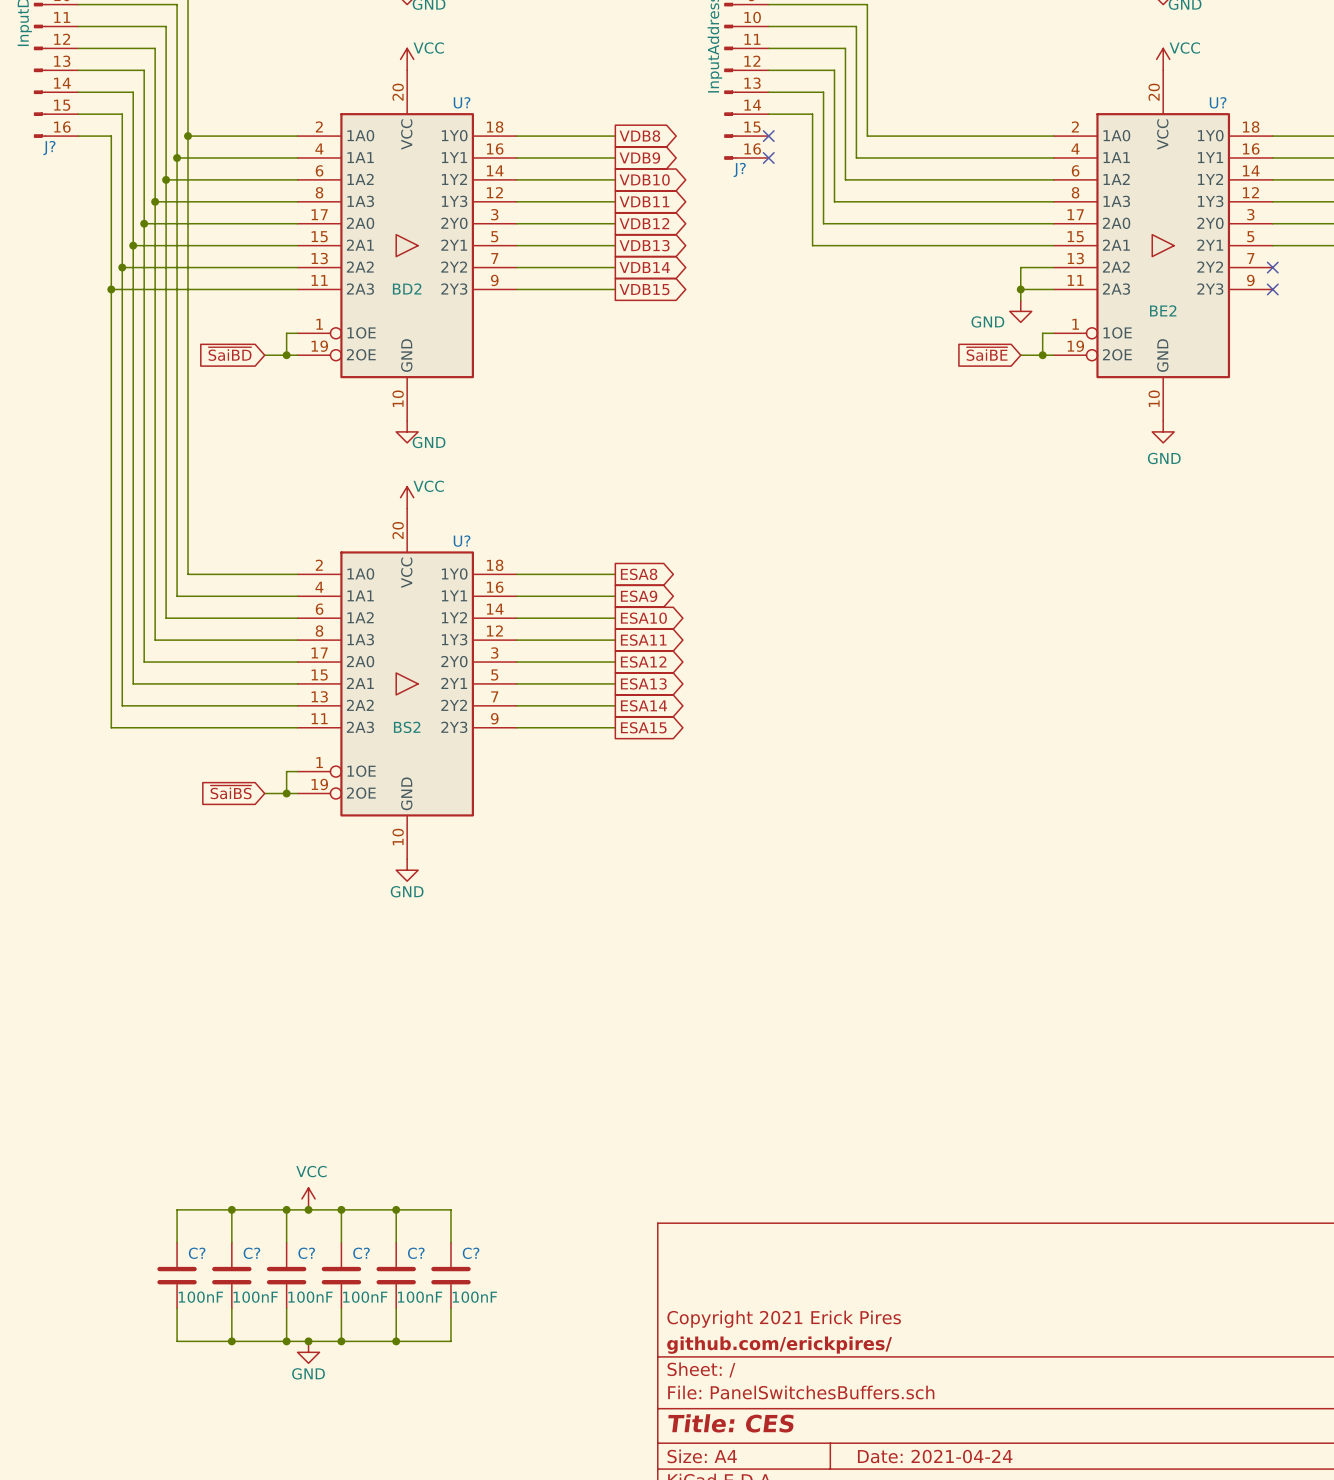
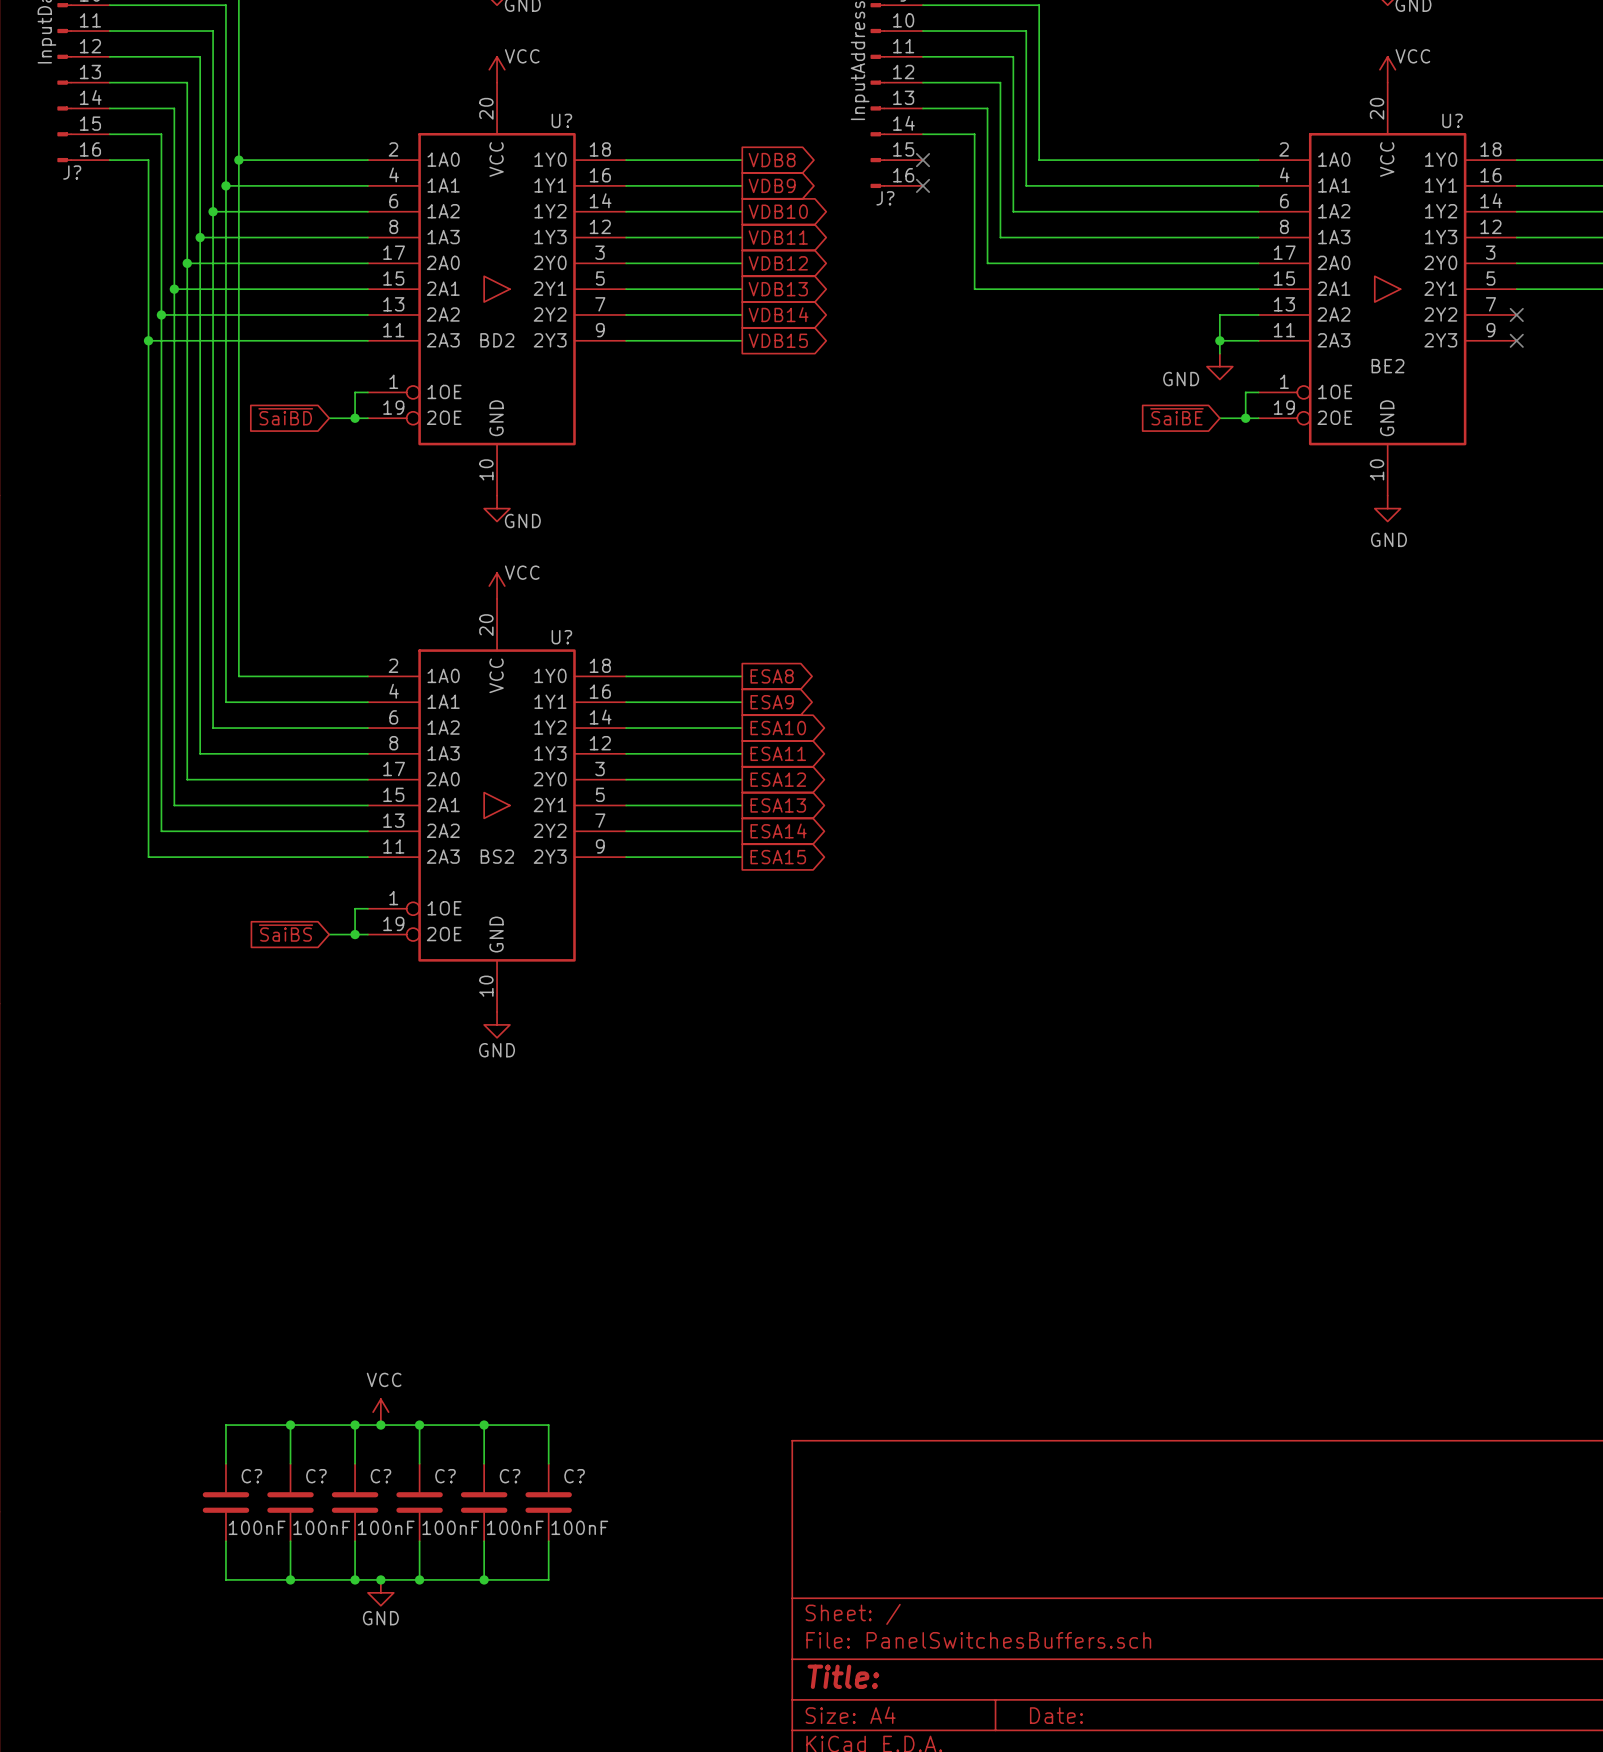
title block: Copyright 2021 Erick Pires (784, 1319) -> none
title block: github.com/erickpires/ (779, 1345) -> none
title block: Title: CES (730, 1423) -> Title: (843, 1676)
title block: Date: 2021-04-24 (935, 1456) -> Date: (1056, 1715)

